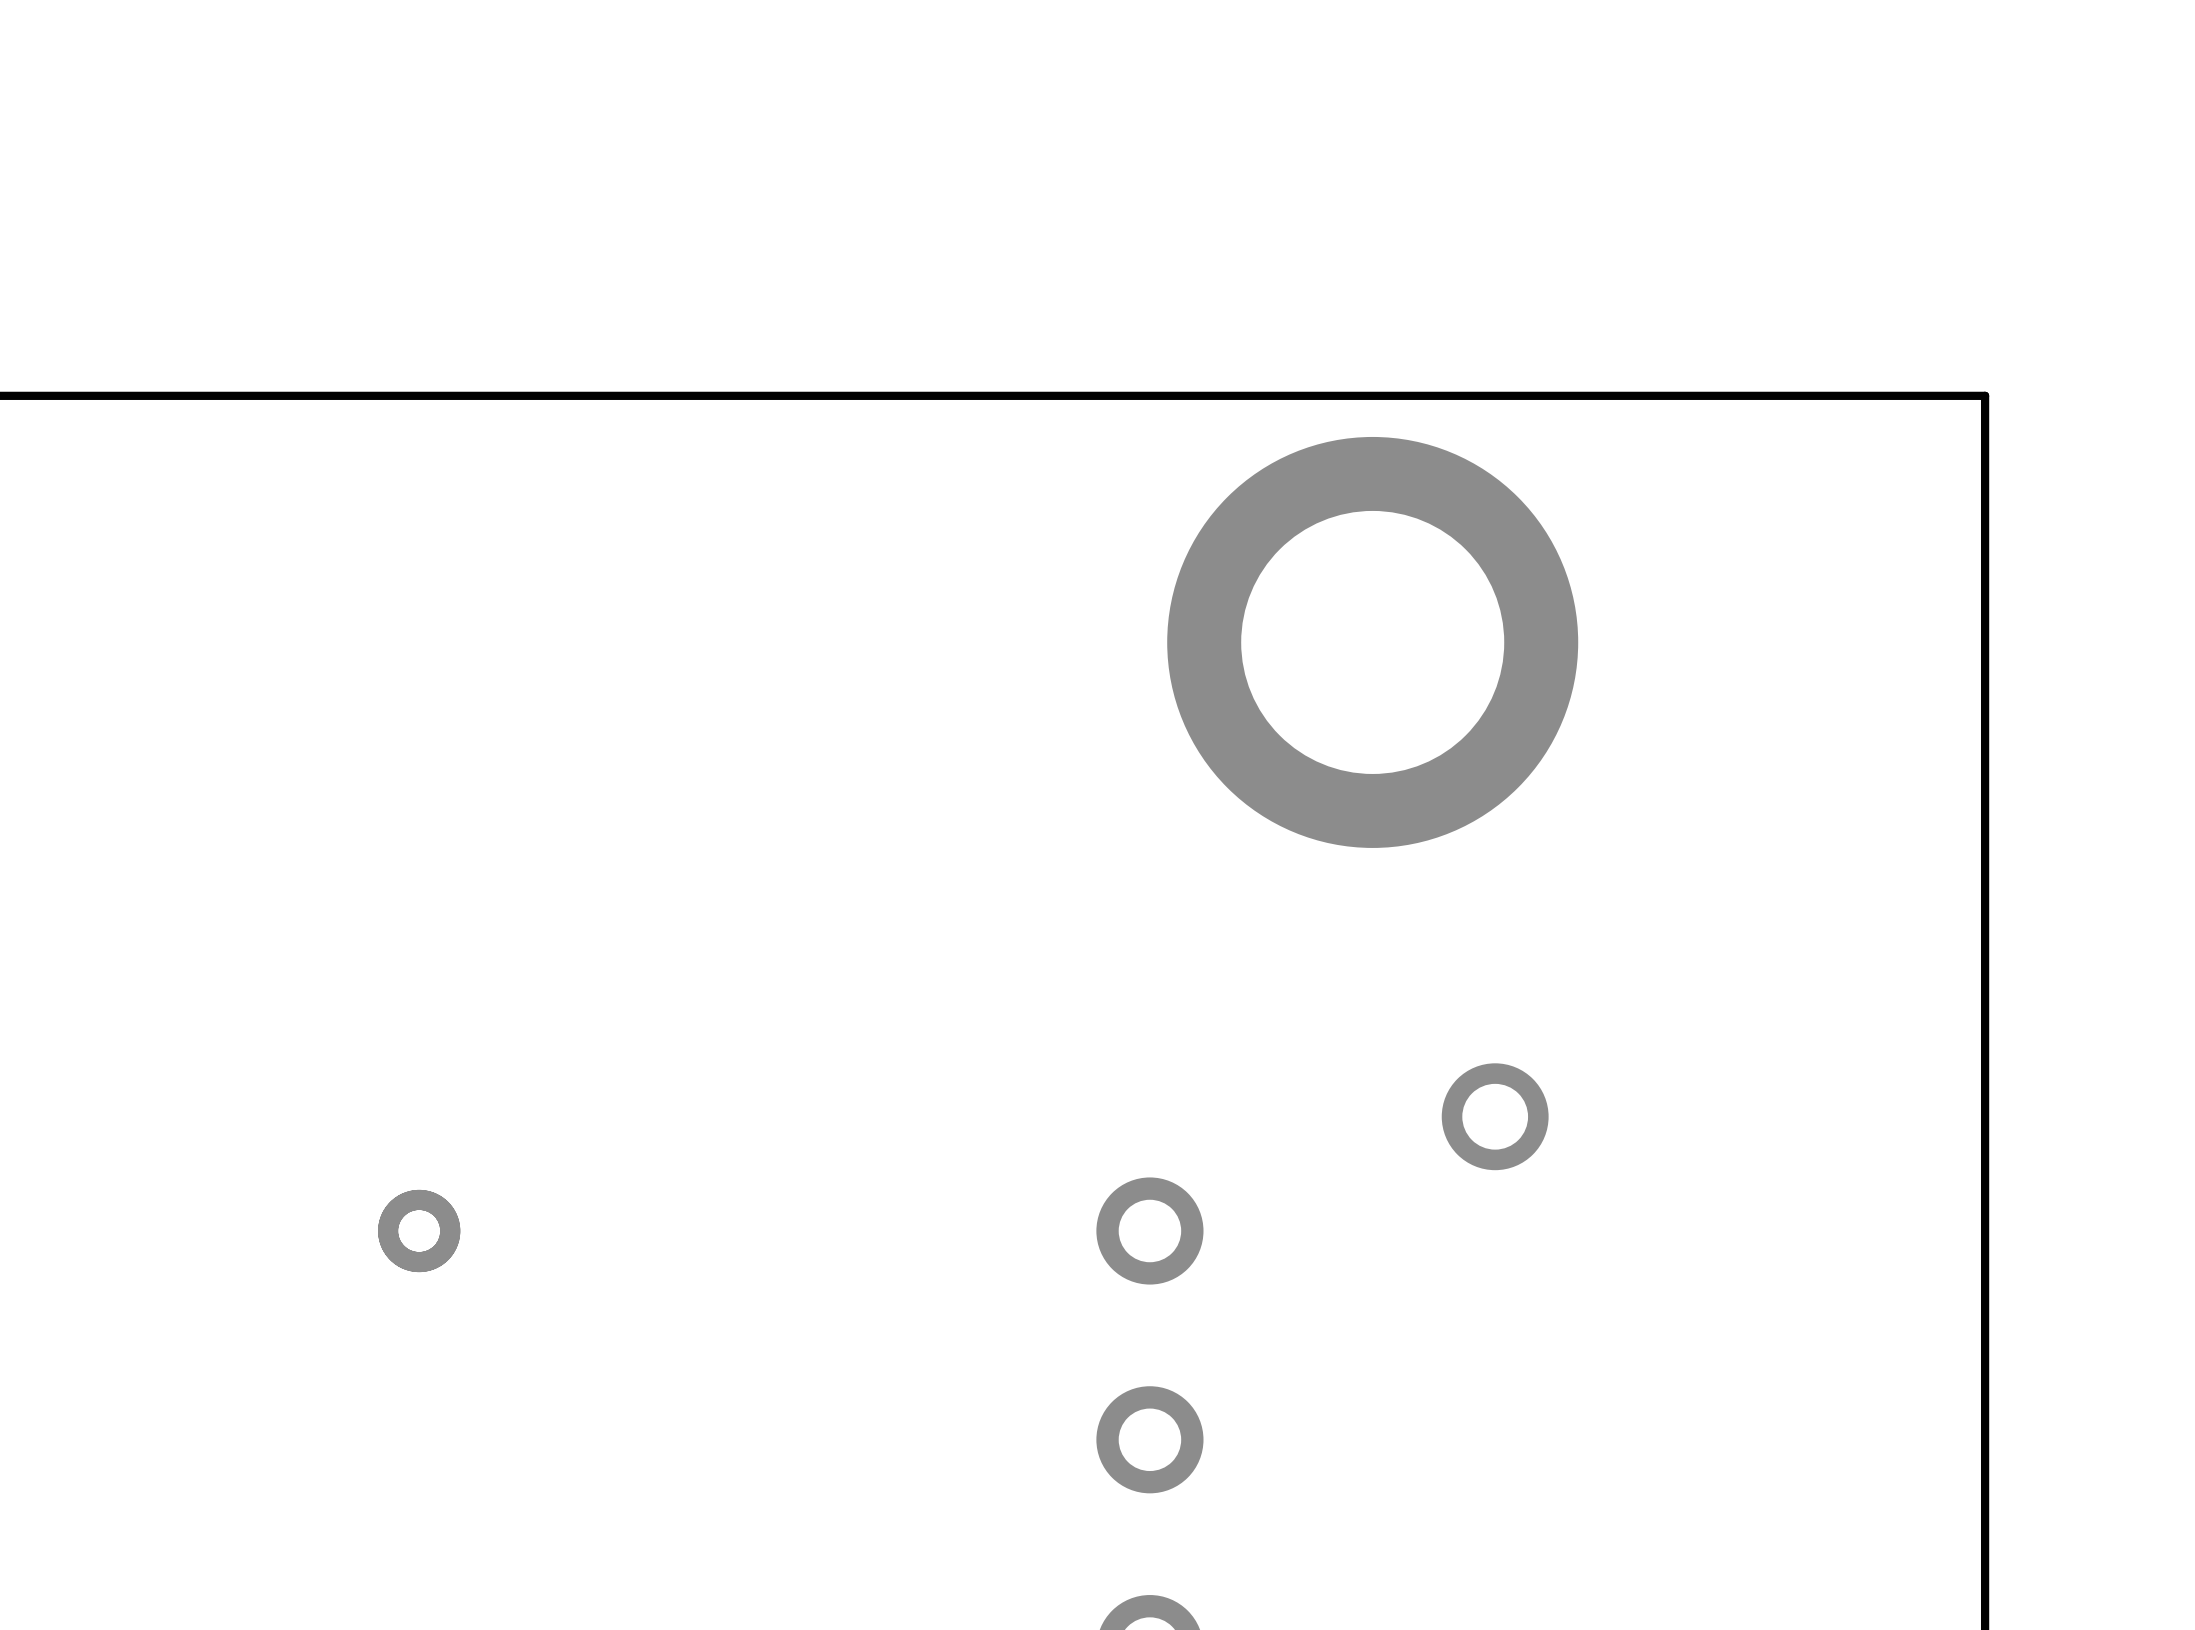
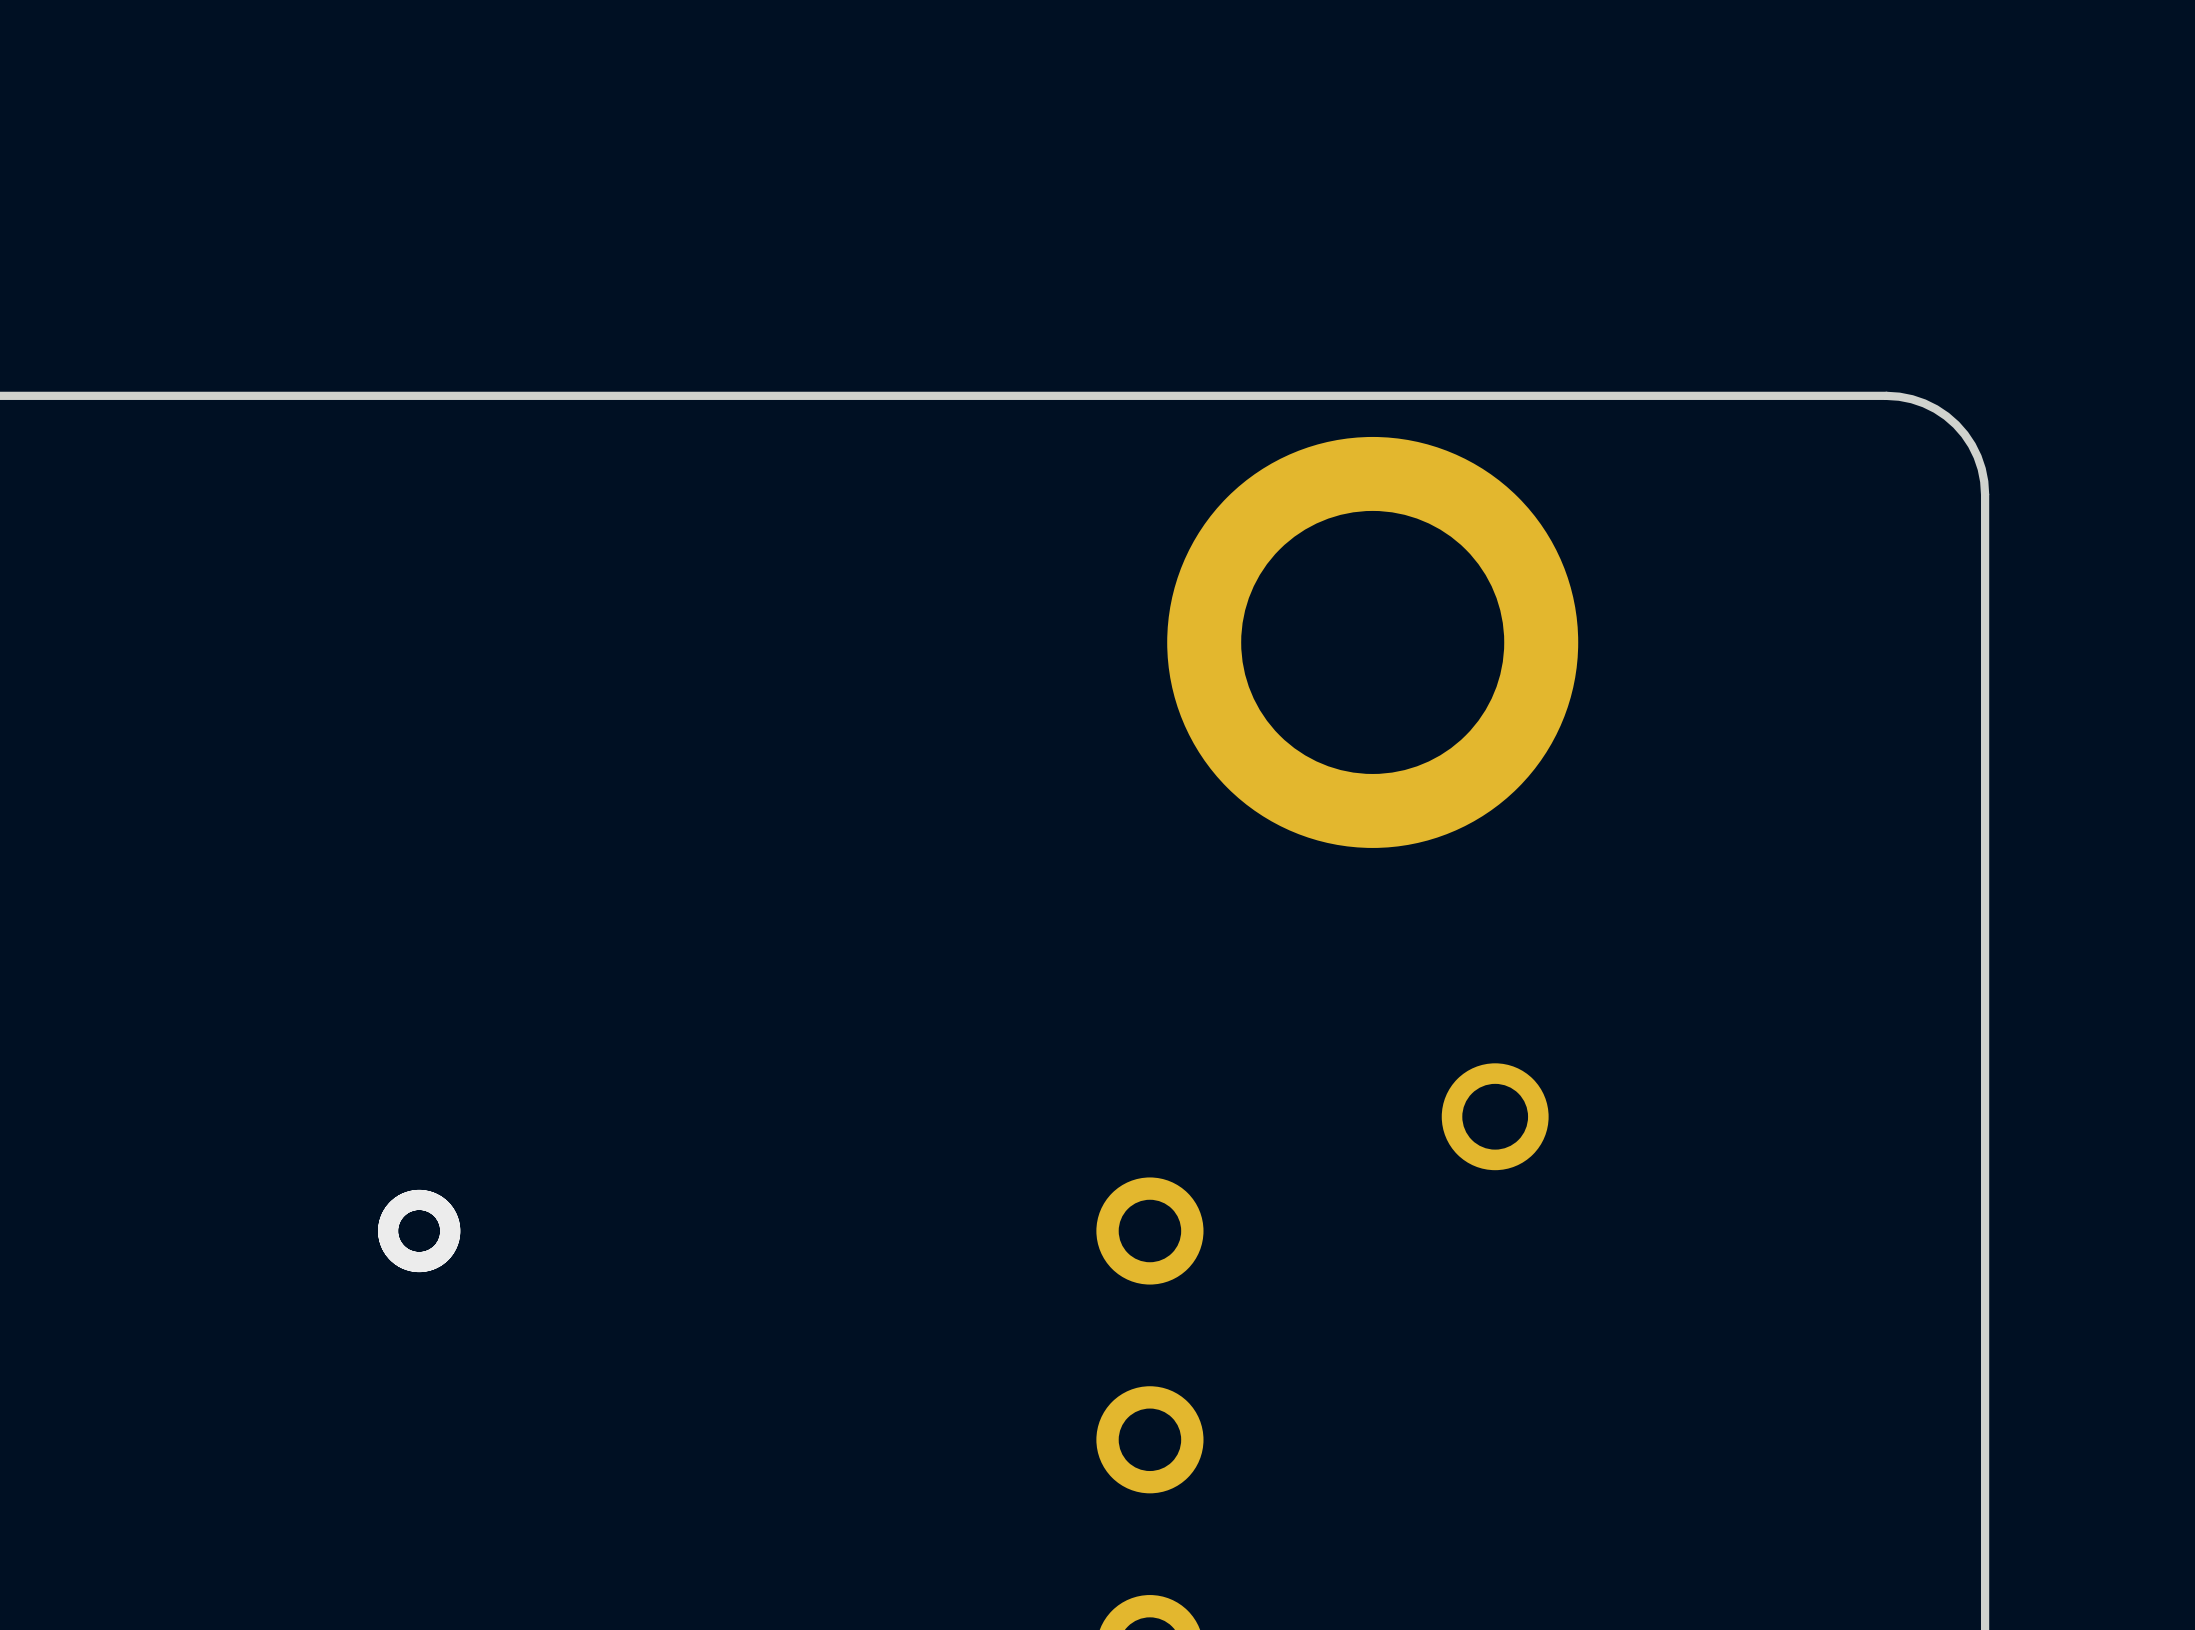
board edge: (1886, 395) (1985, 395) (1985, 494) -> (1886, 395) (1899, 396) (1924, 403) (1946, 416) (1956, 424) (1971, 445) (1977, 456) (1984, 481) (1985, 494)

